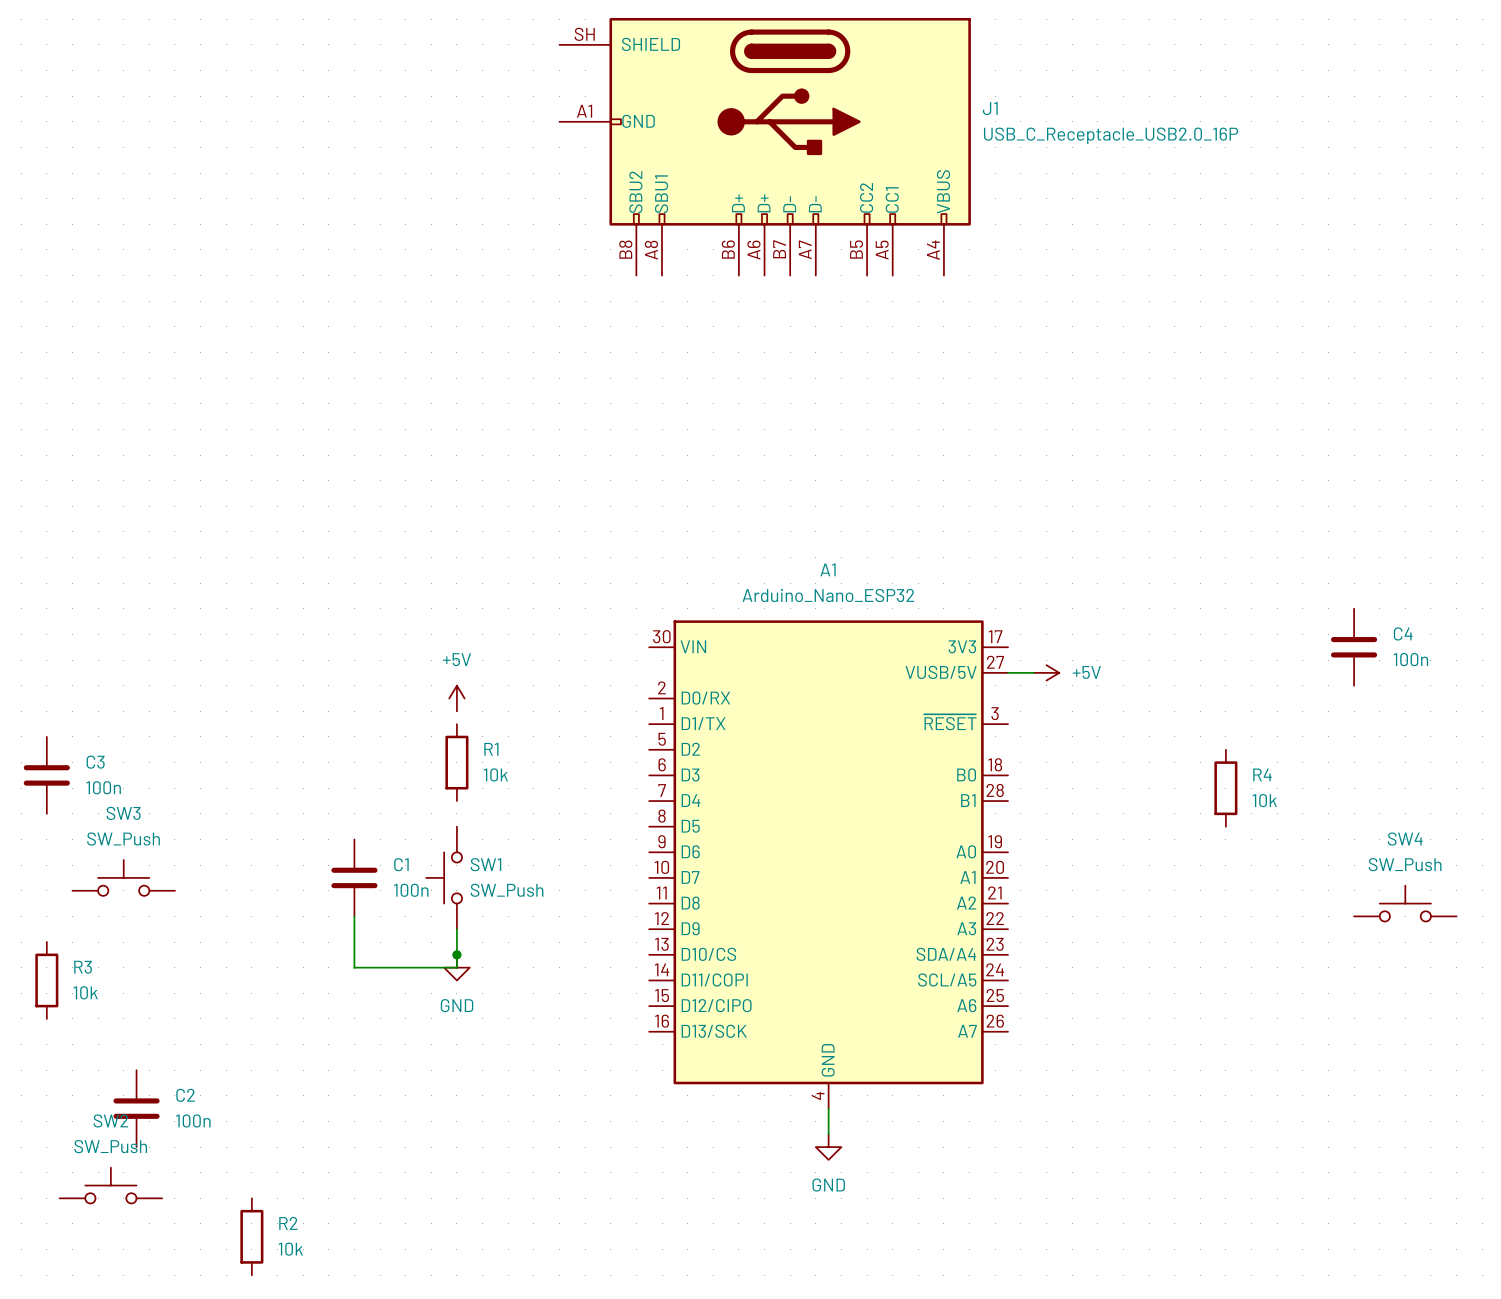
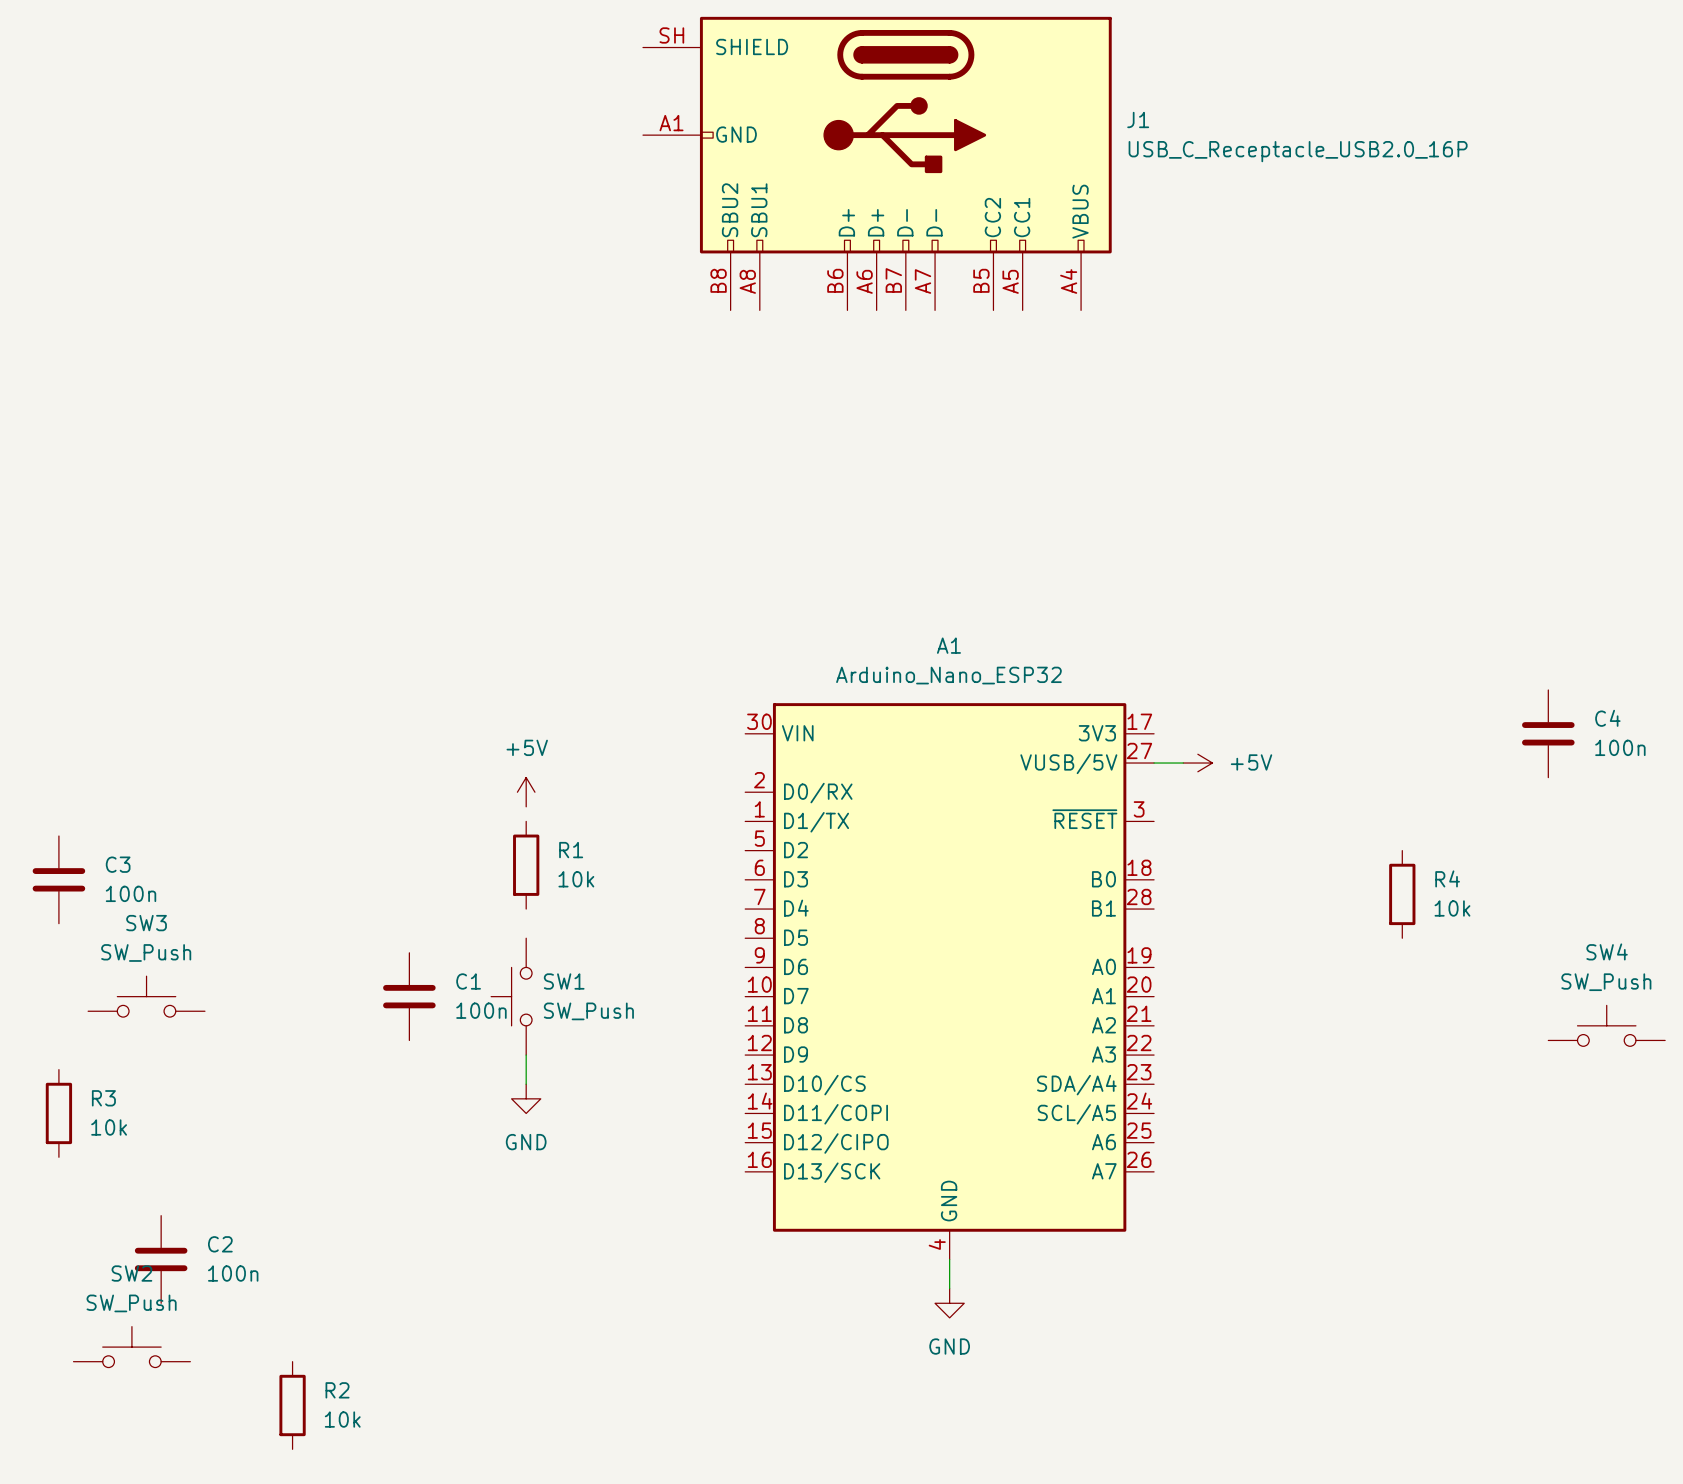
wire: (354, 916) (354, 967) (456, 967) (456, 954) -> none
junction: (456, 954) -> none

